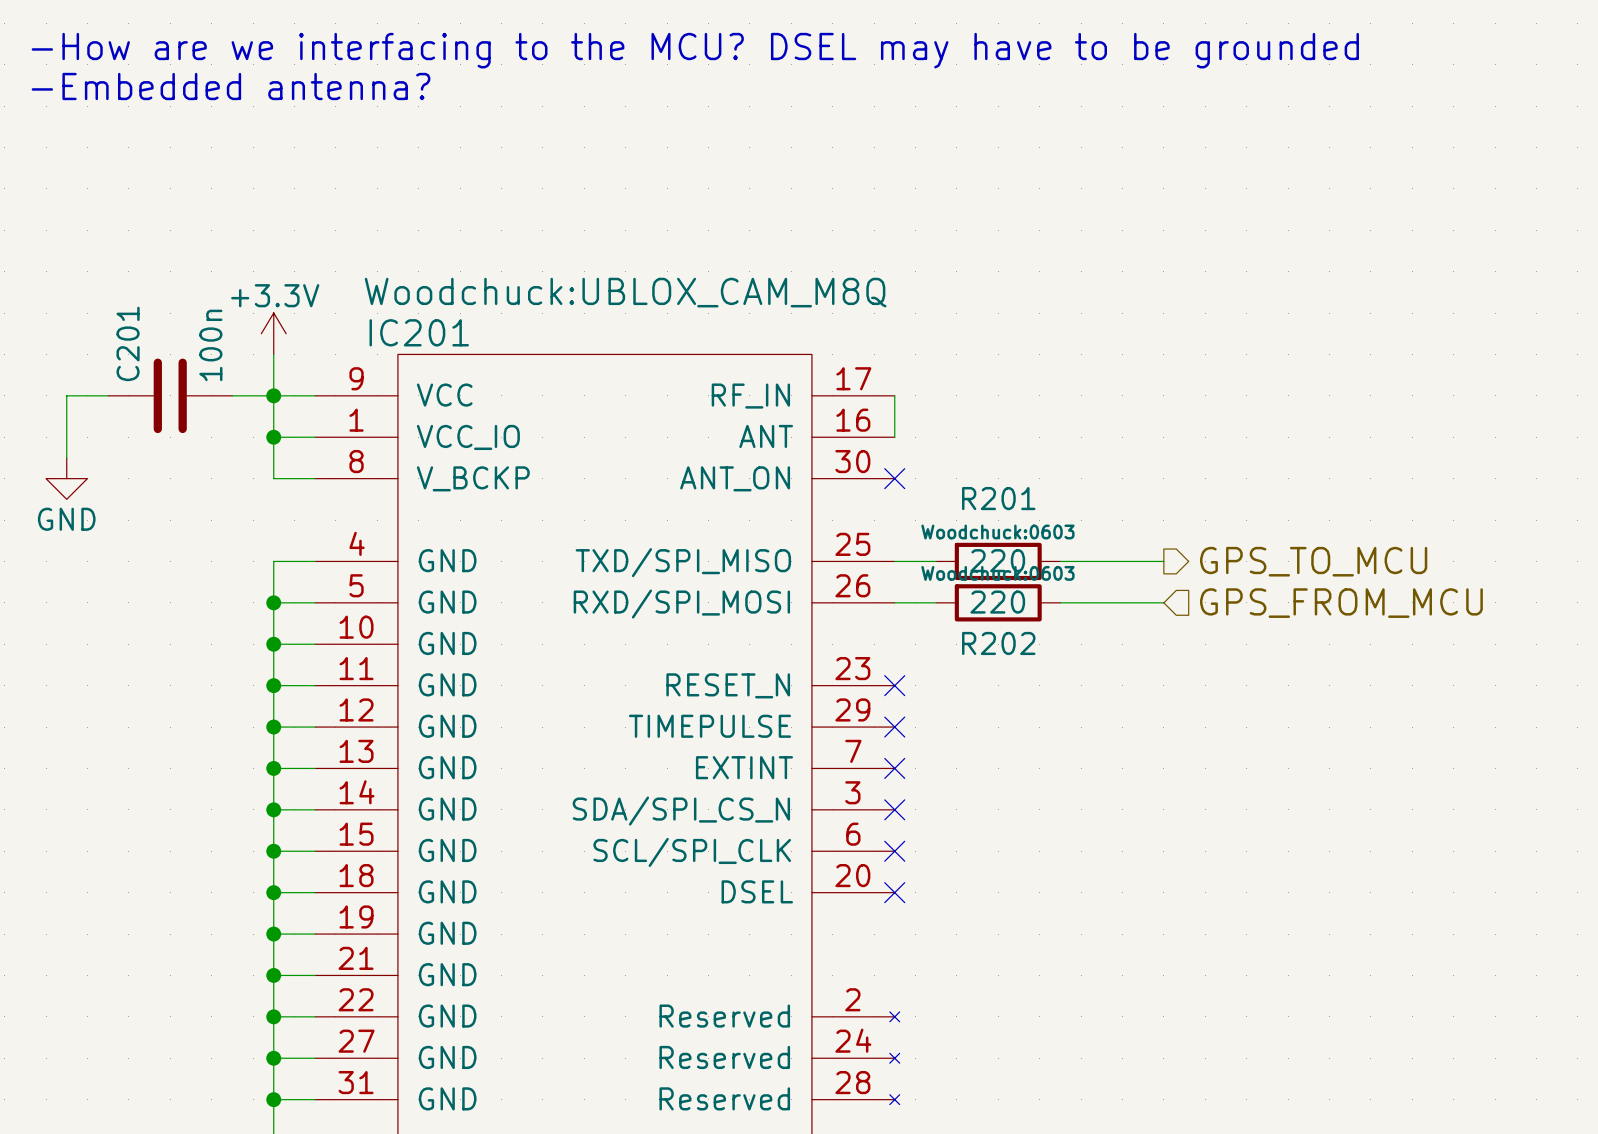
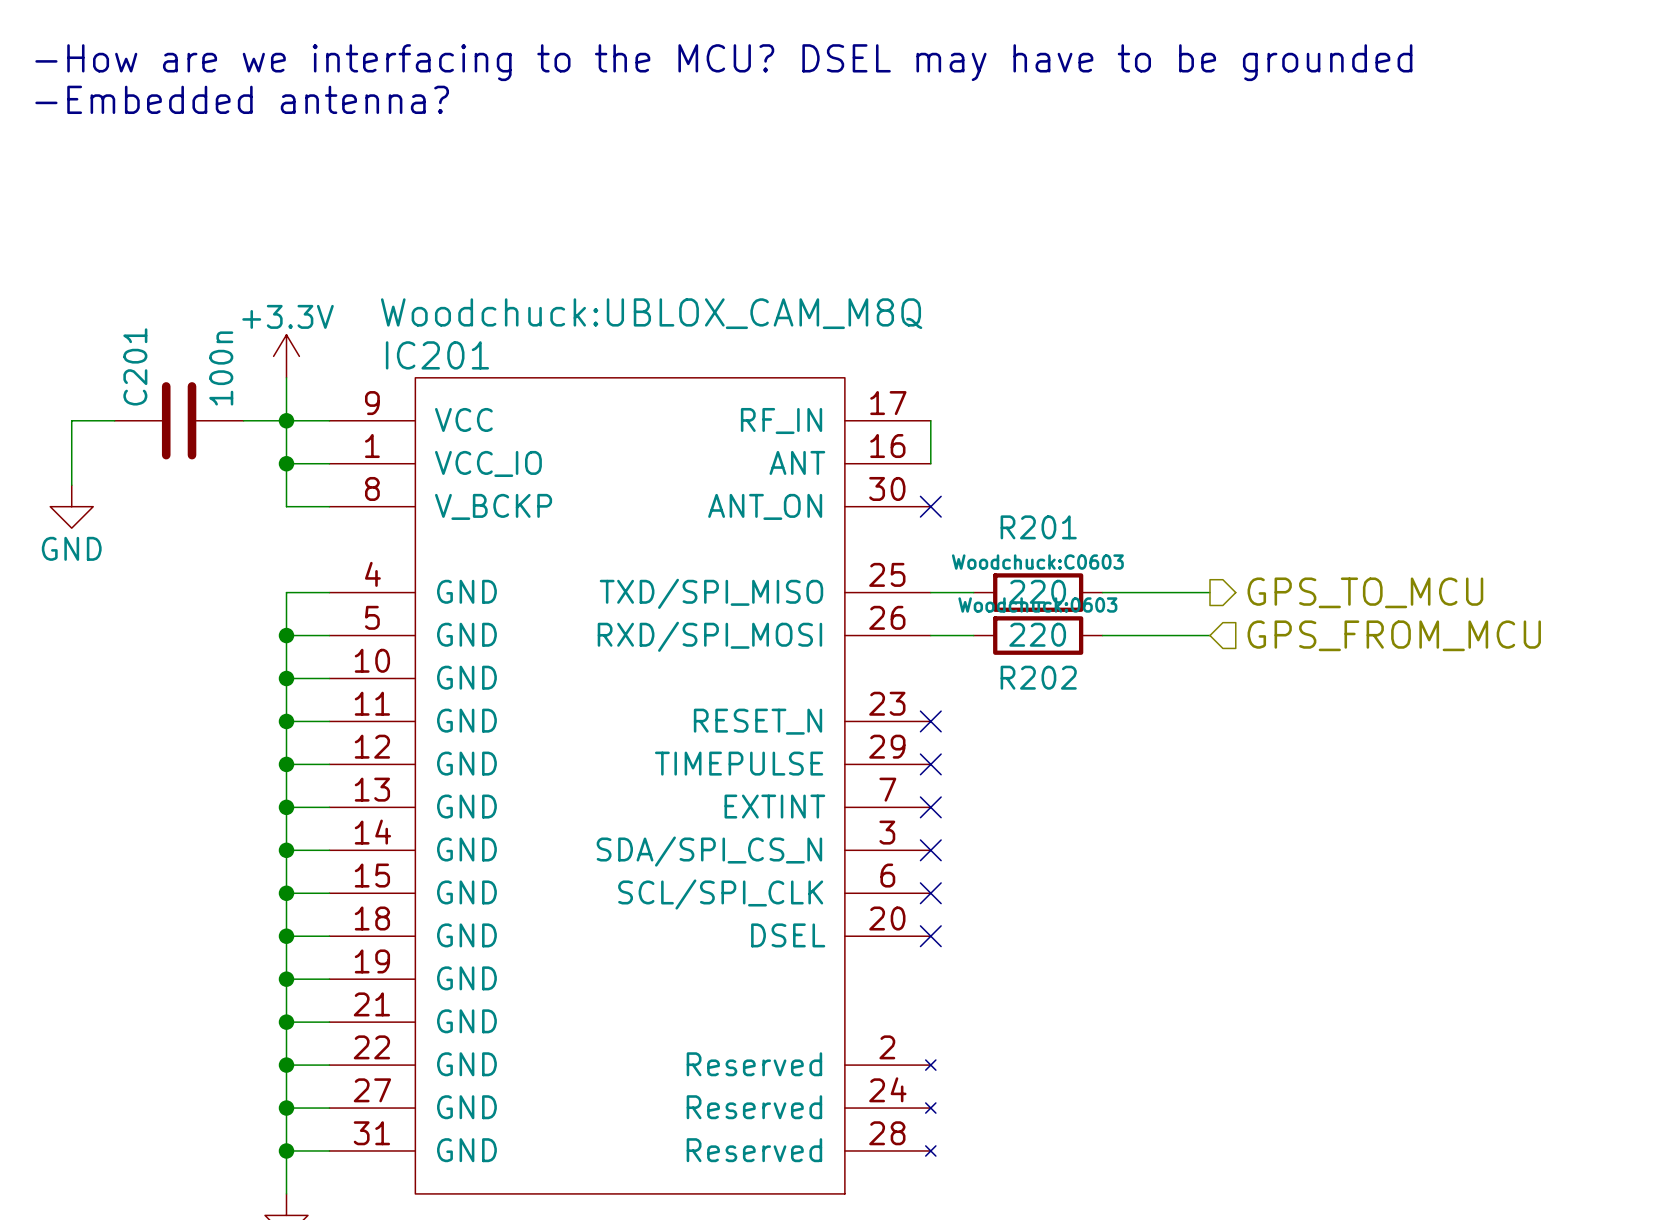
R201 text: Woodchuck:0603 (997, 531) -> Woodchuck:C0603 (1037, 562)

